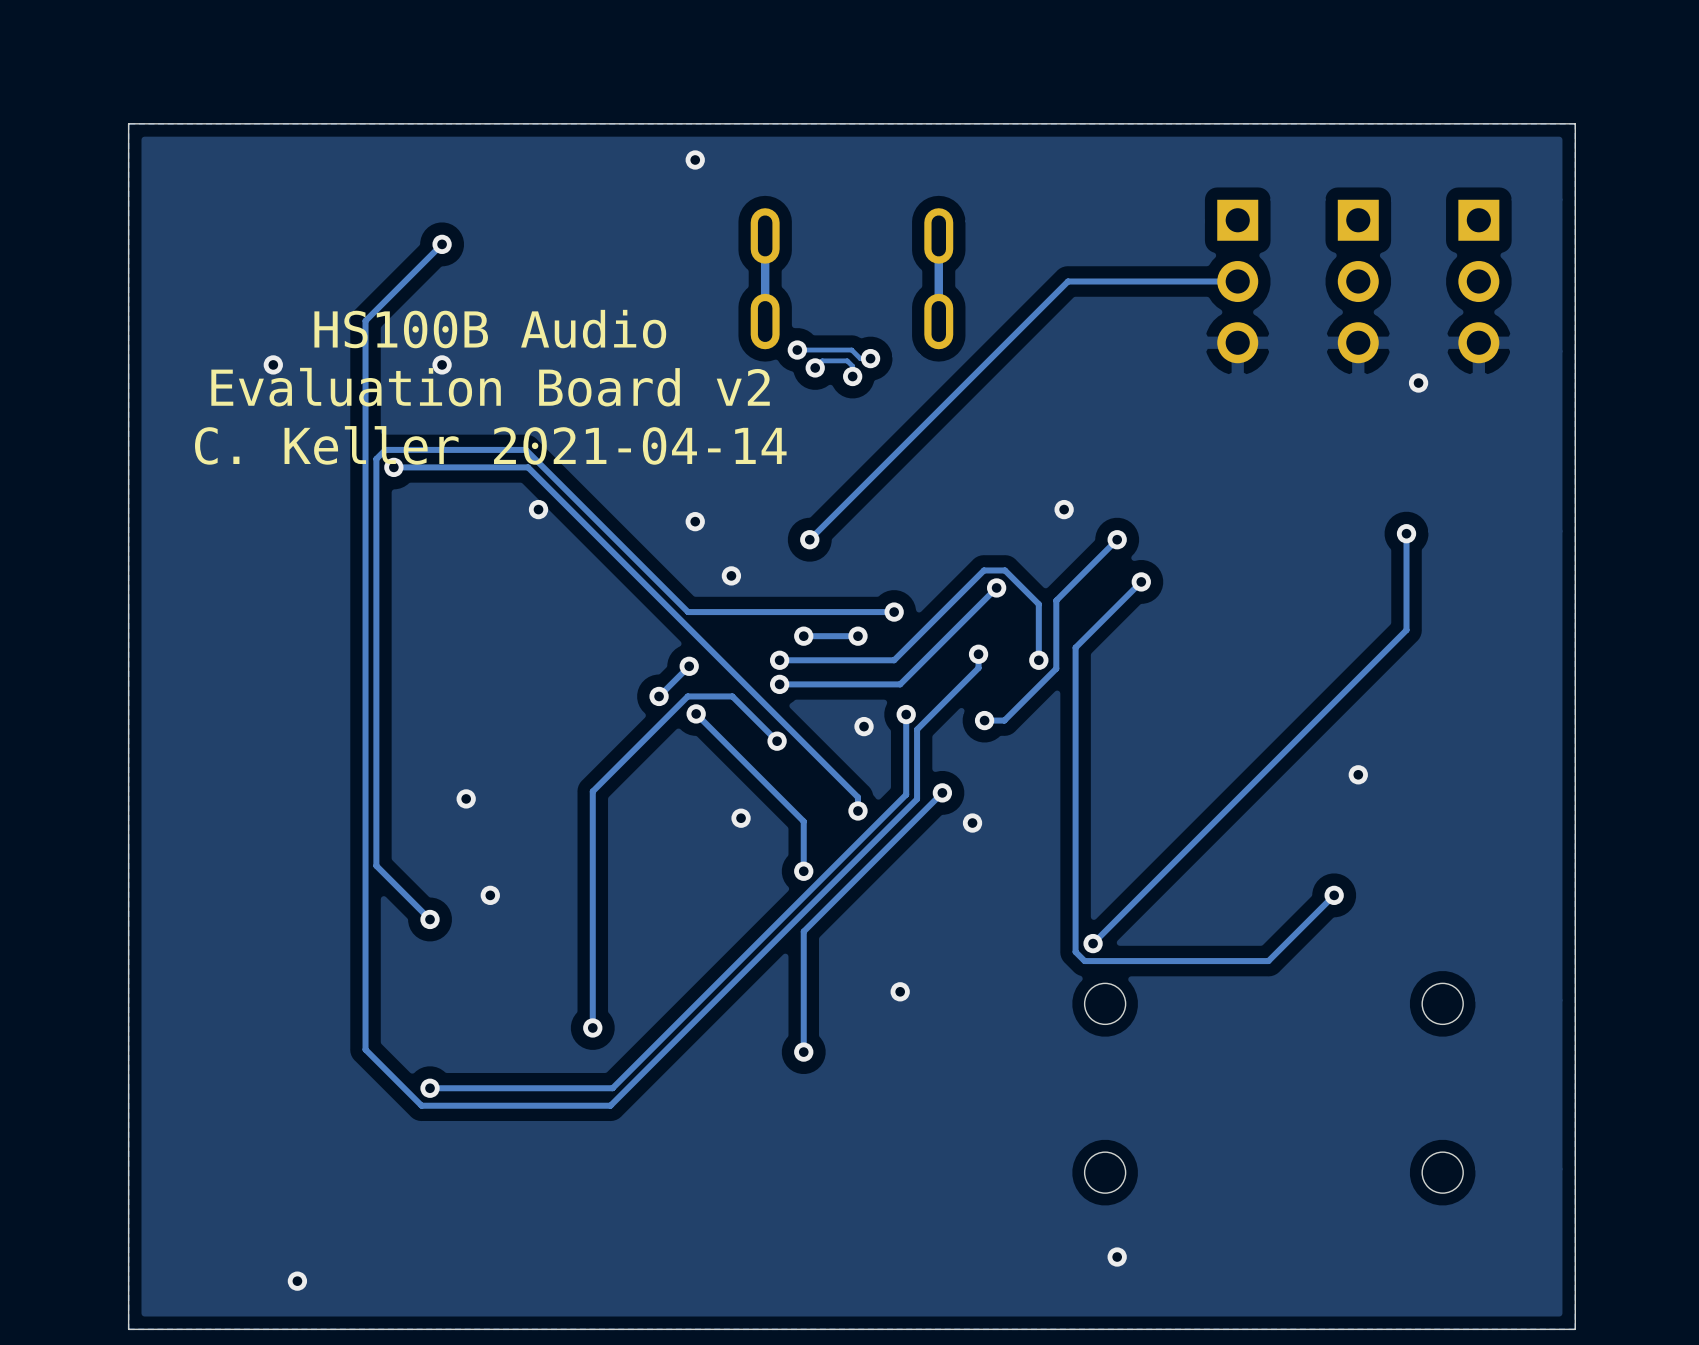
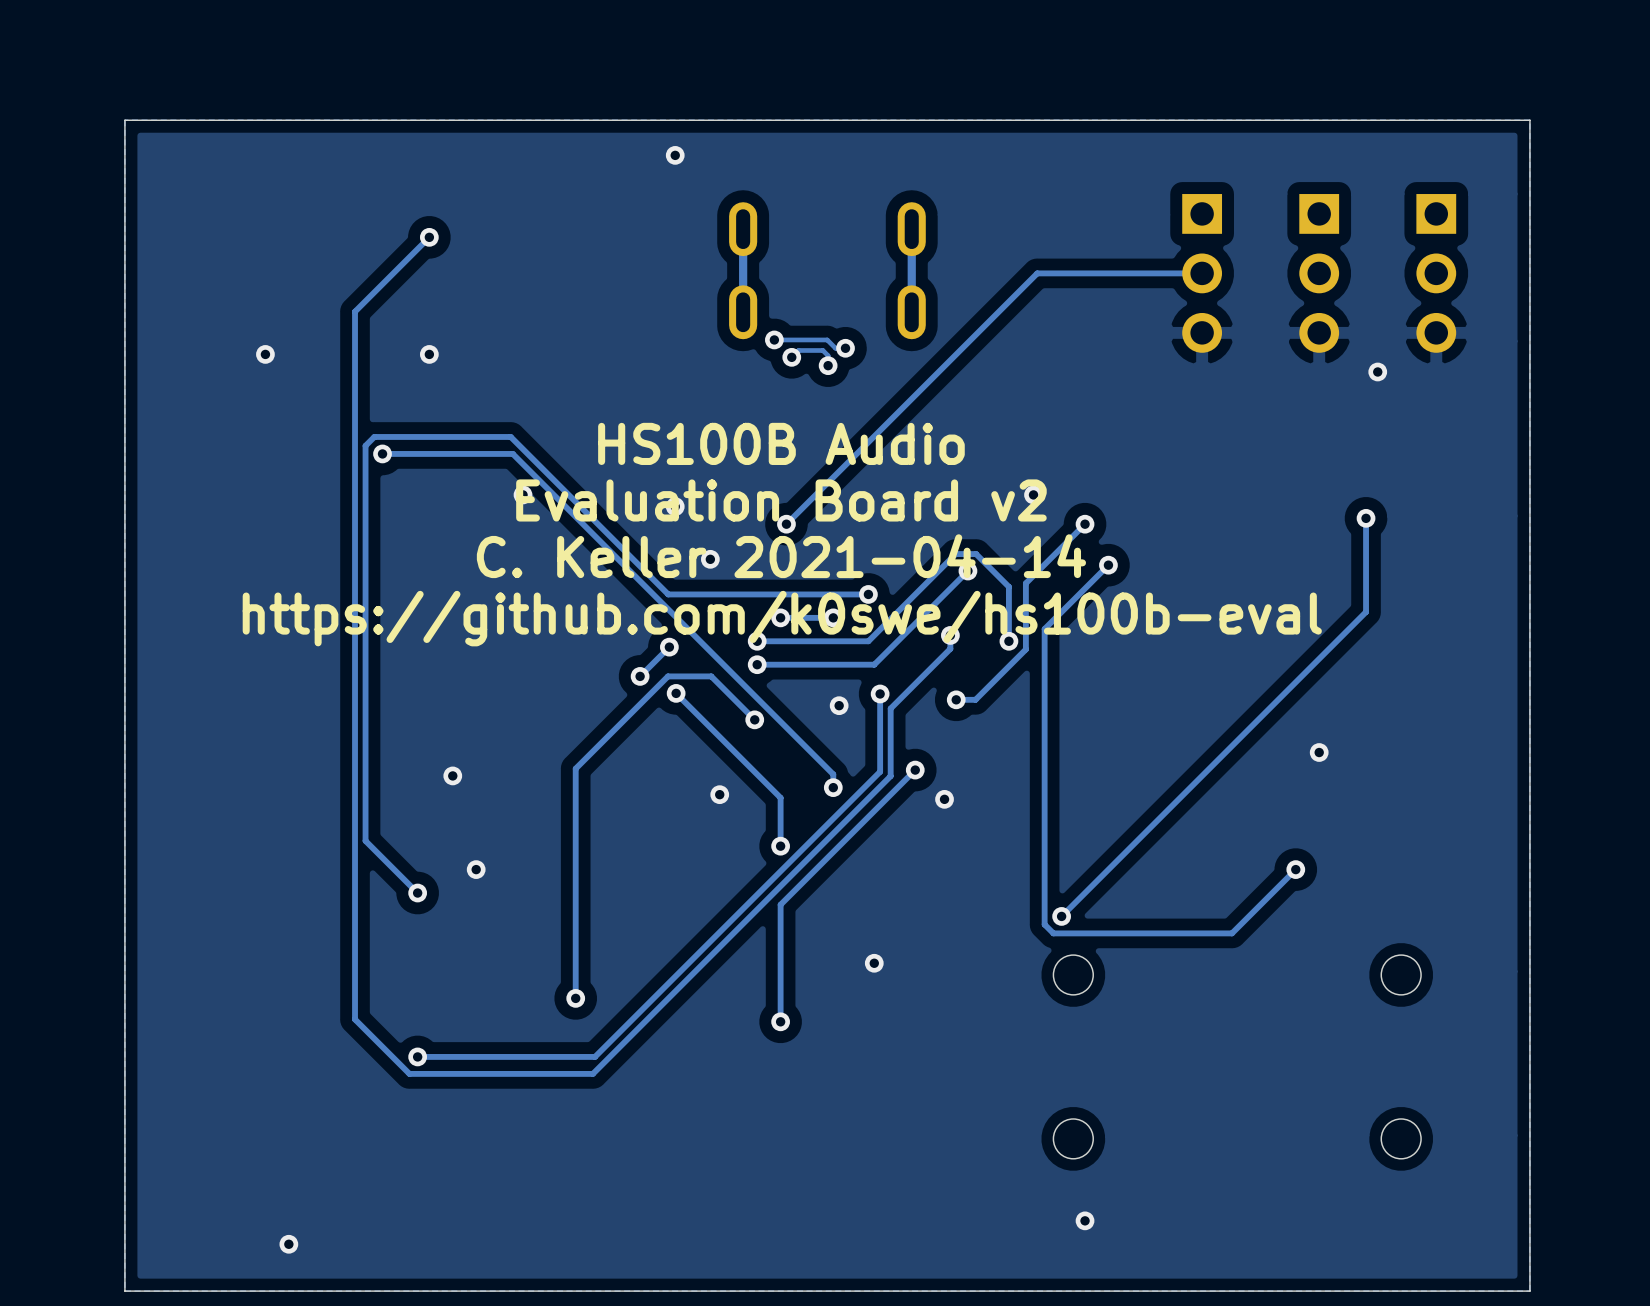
text position: HS100B Audio (490, 329) -> HS100B Audio (781, 443)
text position: Evaluation Board v2 (490, 387) -> Evaluation Board v2 (781, 500)
text position: C. Keller 2021-04-14 (490, 445) -> C. Keller 2021-04-14 (781, 556)
text: none -> https://github.com/k0swe/hs100b-eval (782, 618)

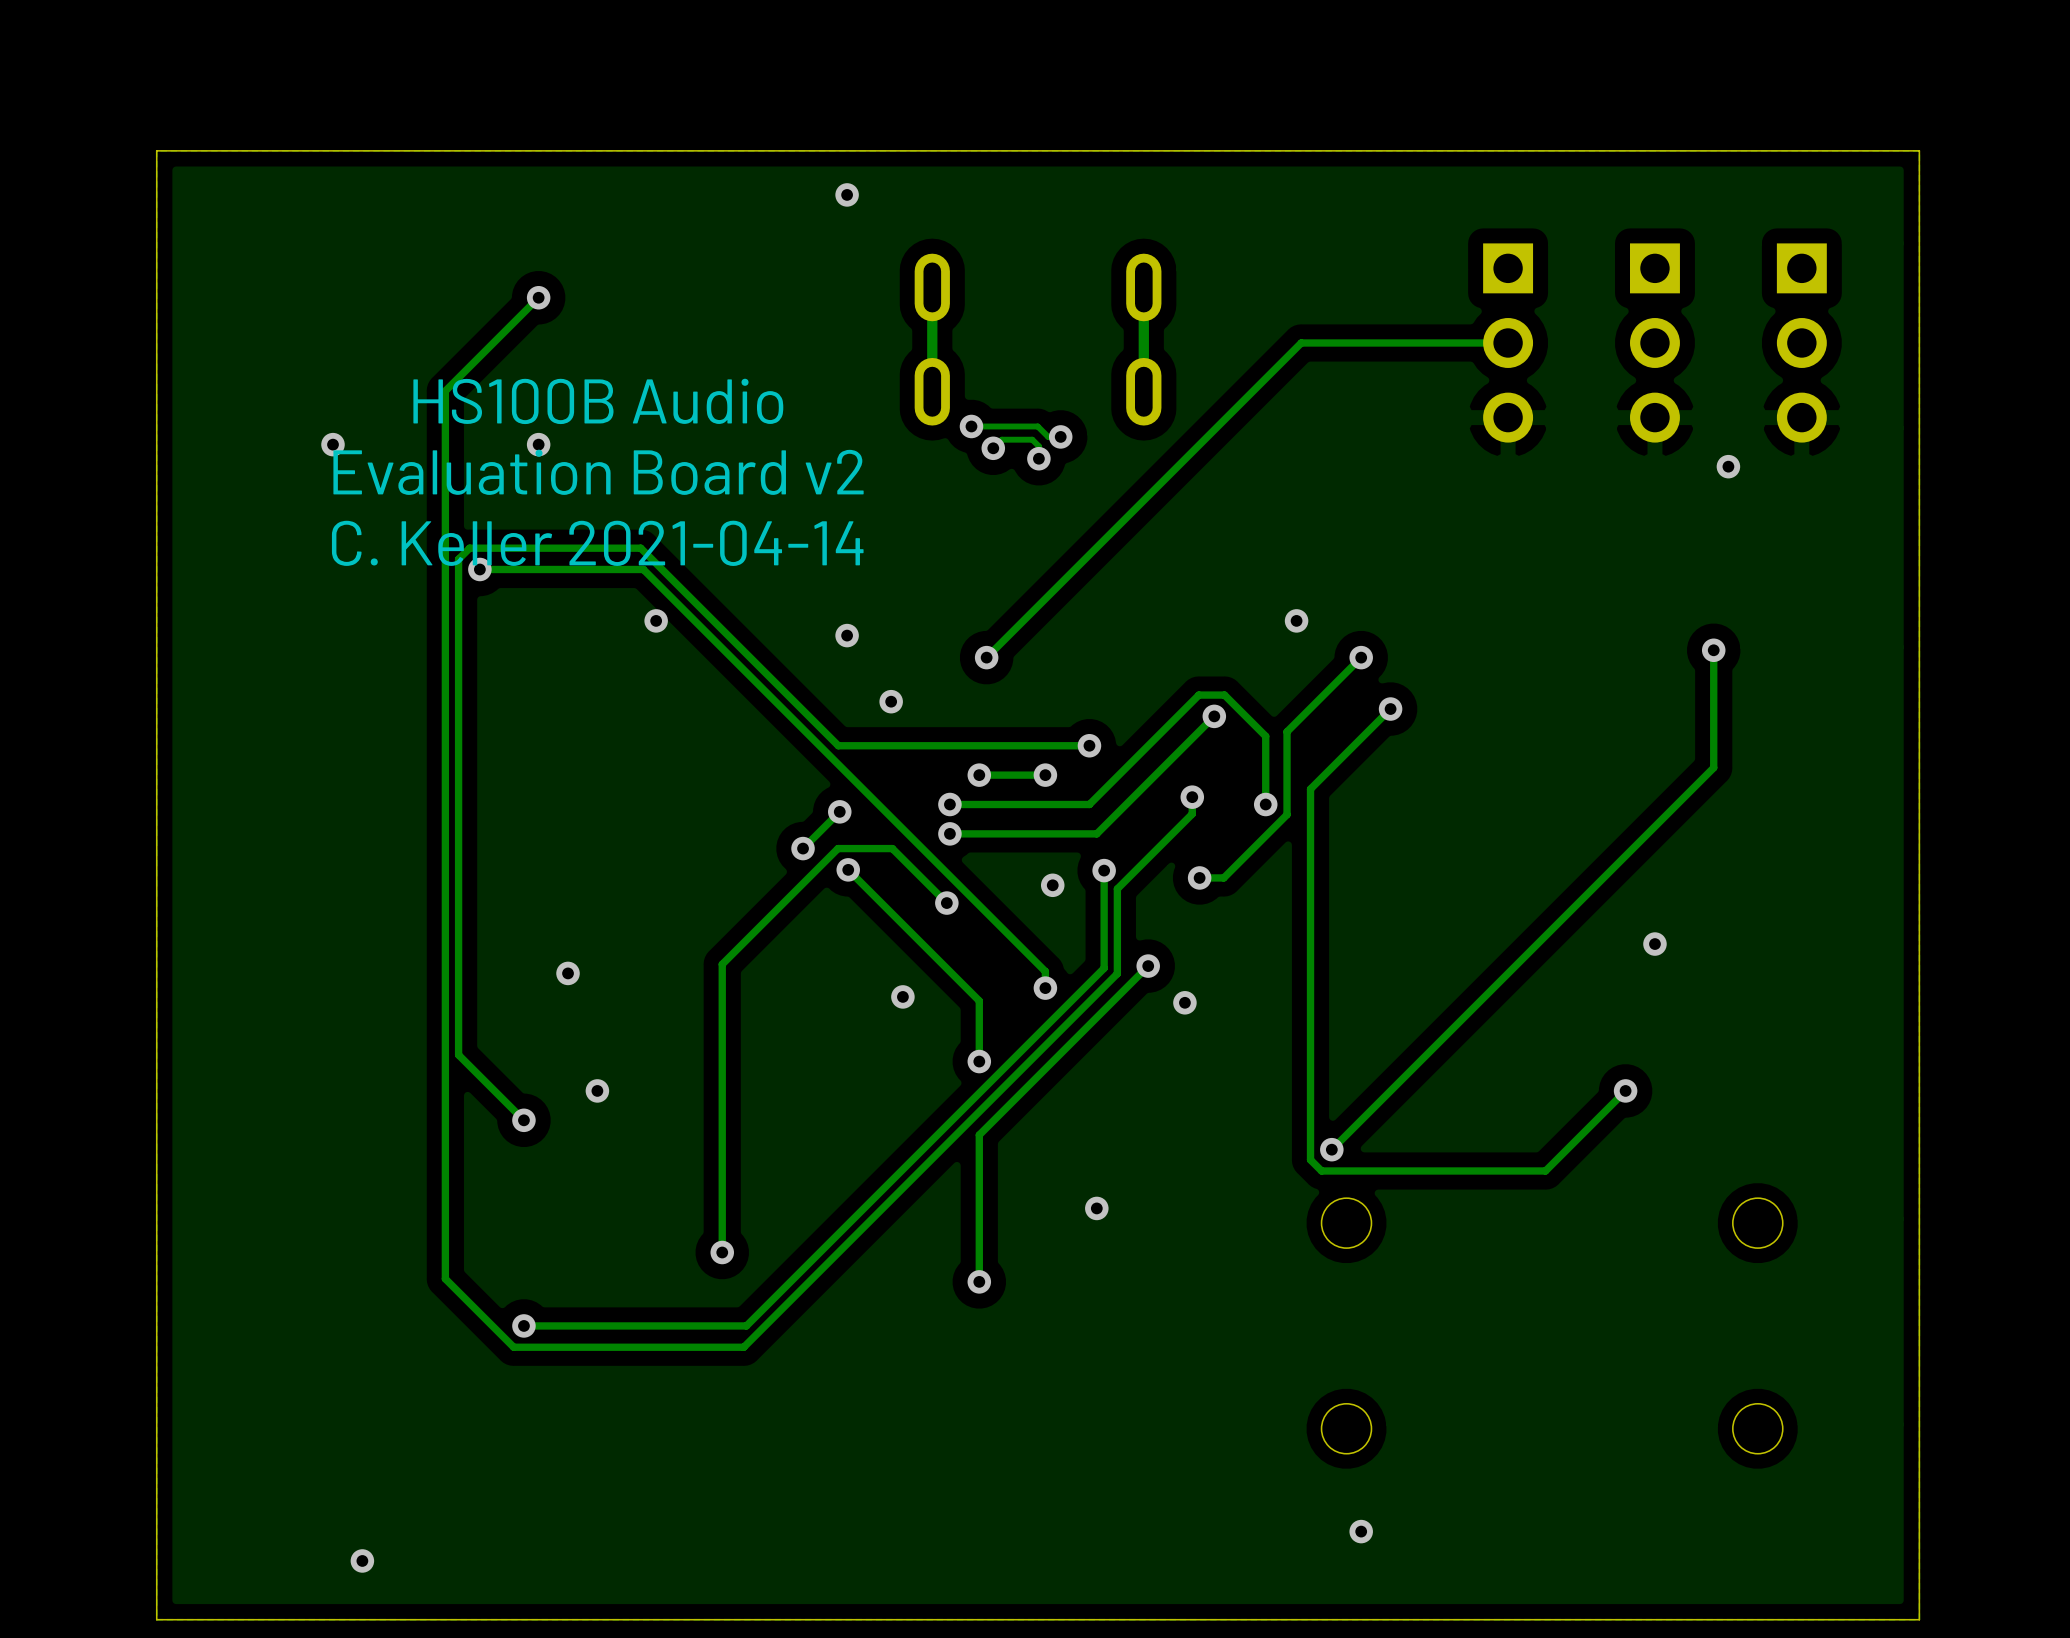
text position: HS100B Audio (781, 443) -> HS100B Audio (598, 401)
text position: Evaluation Board v2 (781, 500) -> Evaluation Board v2 (598, 472)
text position: C. Keller 2021-04-14 (781, 556) -> C. Keller 2021-04-14 (597, 543)
text: https://github.com/k0swe/hs100b-eval (782, 618) -> none

